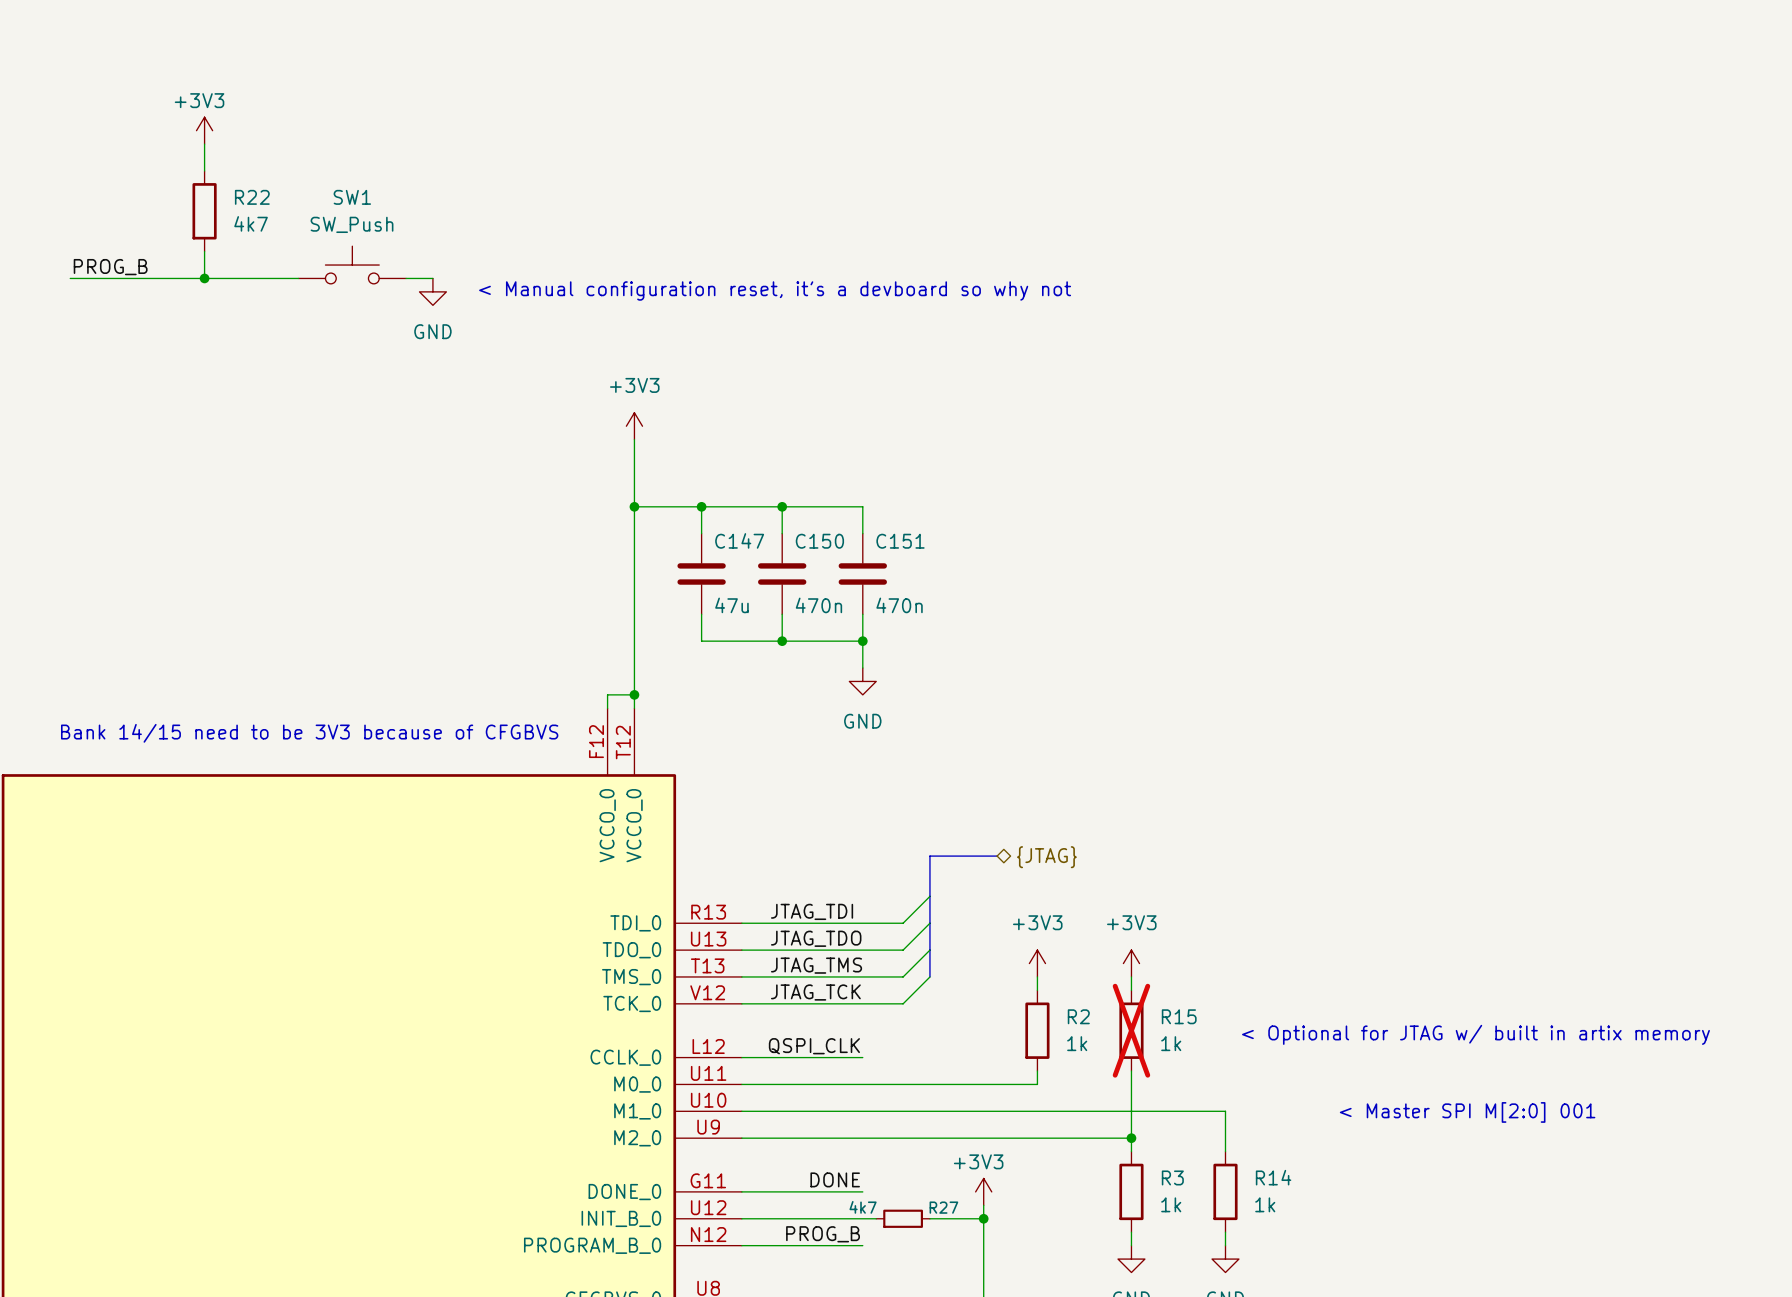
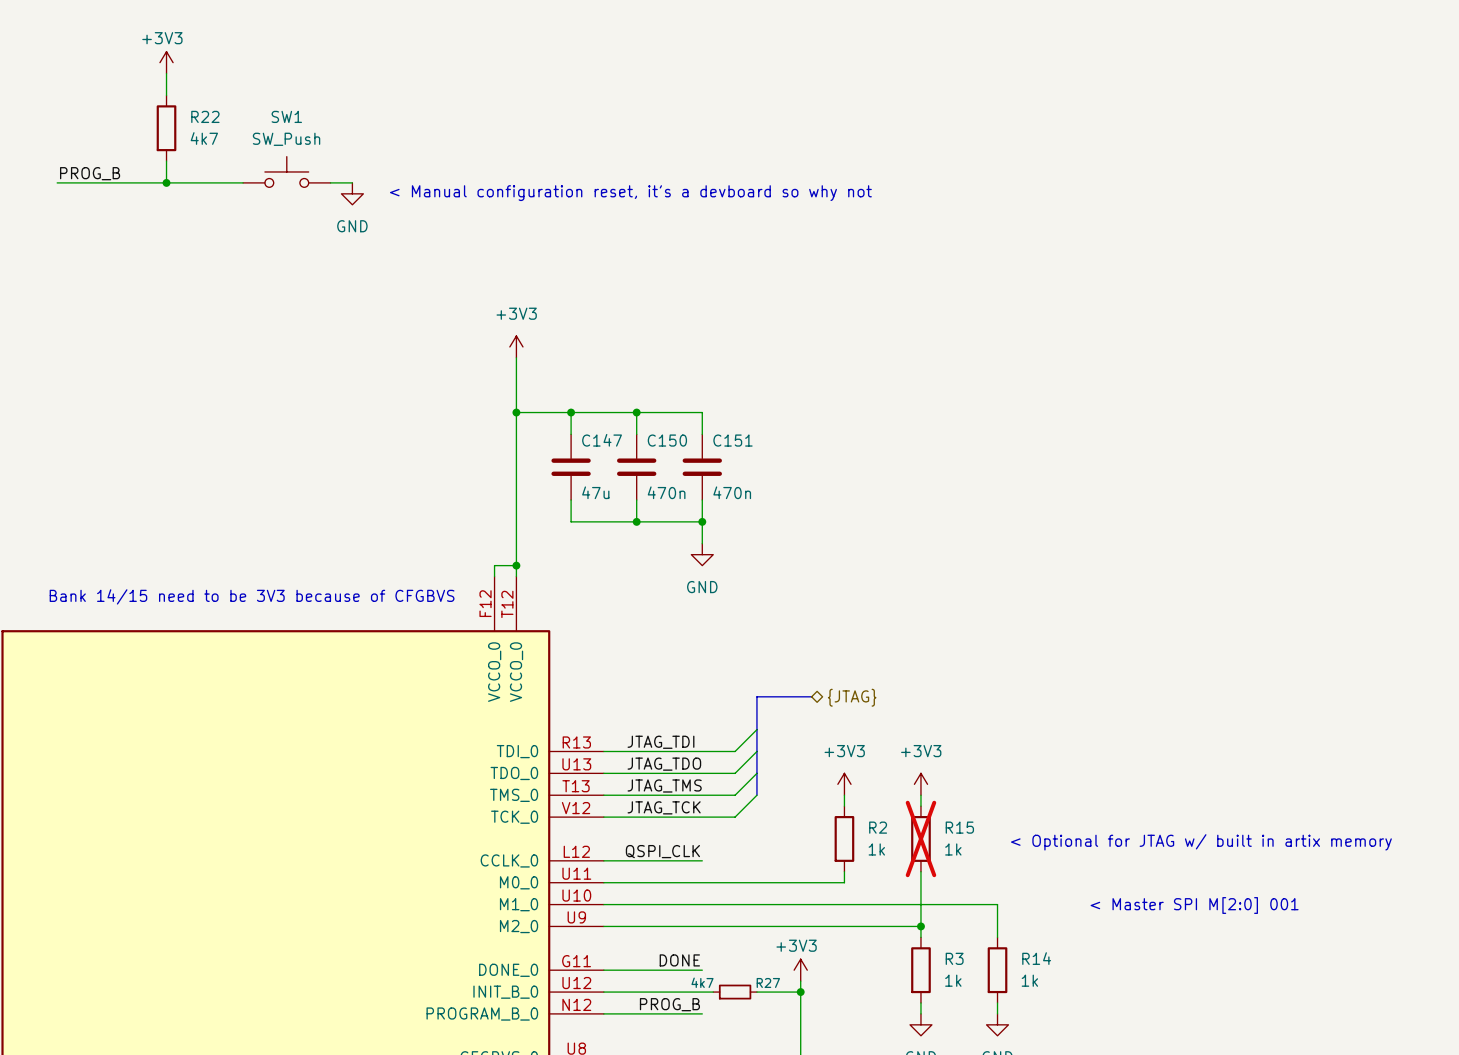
power symbol position: +3V3 (204, 130) -> +3V3 (166, 62)
wire: (204, 144) (204, 170) -> (166, 73) (166, 95)
R22 position: (204, 211) -> (166, 128)
wire: (204, 251) (204, 278) -> (166, 161) (166, 182)
SW1 position: (352, 265) -> (286, 171)
label position: PROG_B (110, 267) -> PROG_B (90, 173)
wire: (70, 278) (298, 278) -> (57, 182) (243, 182)
junction position: (204, 278) -> (166, 182)
wire: (406, 278) (432, 278) -> (330, 182) (352, 182)
text position: < Manual configuration reset, it's a devboard so why not (775, 290) -> < Manual configuration reset, it's a devboard so why not (630, 193)
power symbol position: GND (432, 291) -> GND (352, 193)

